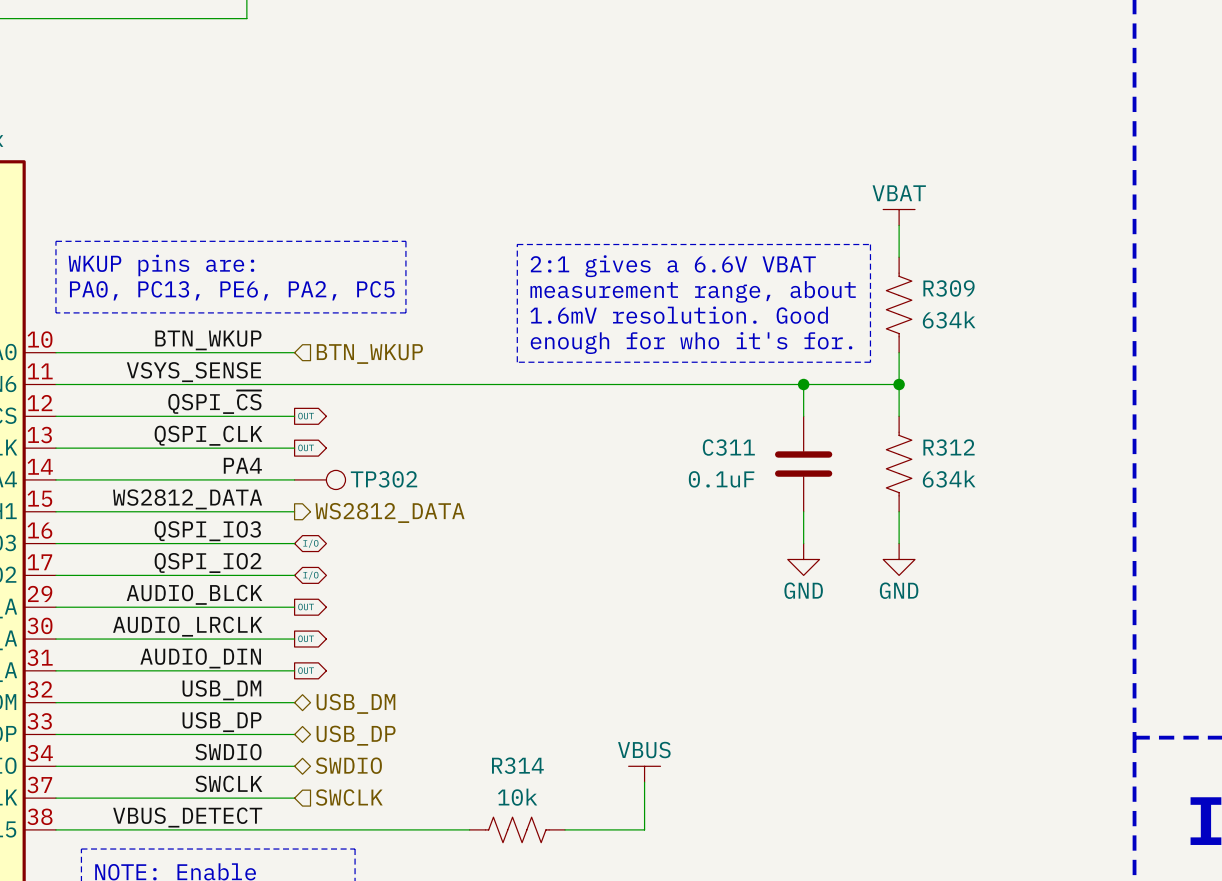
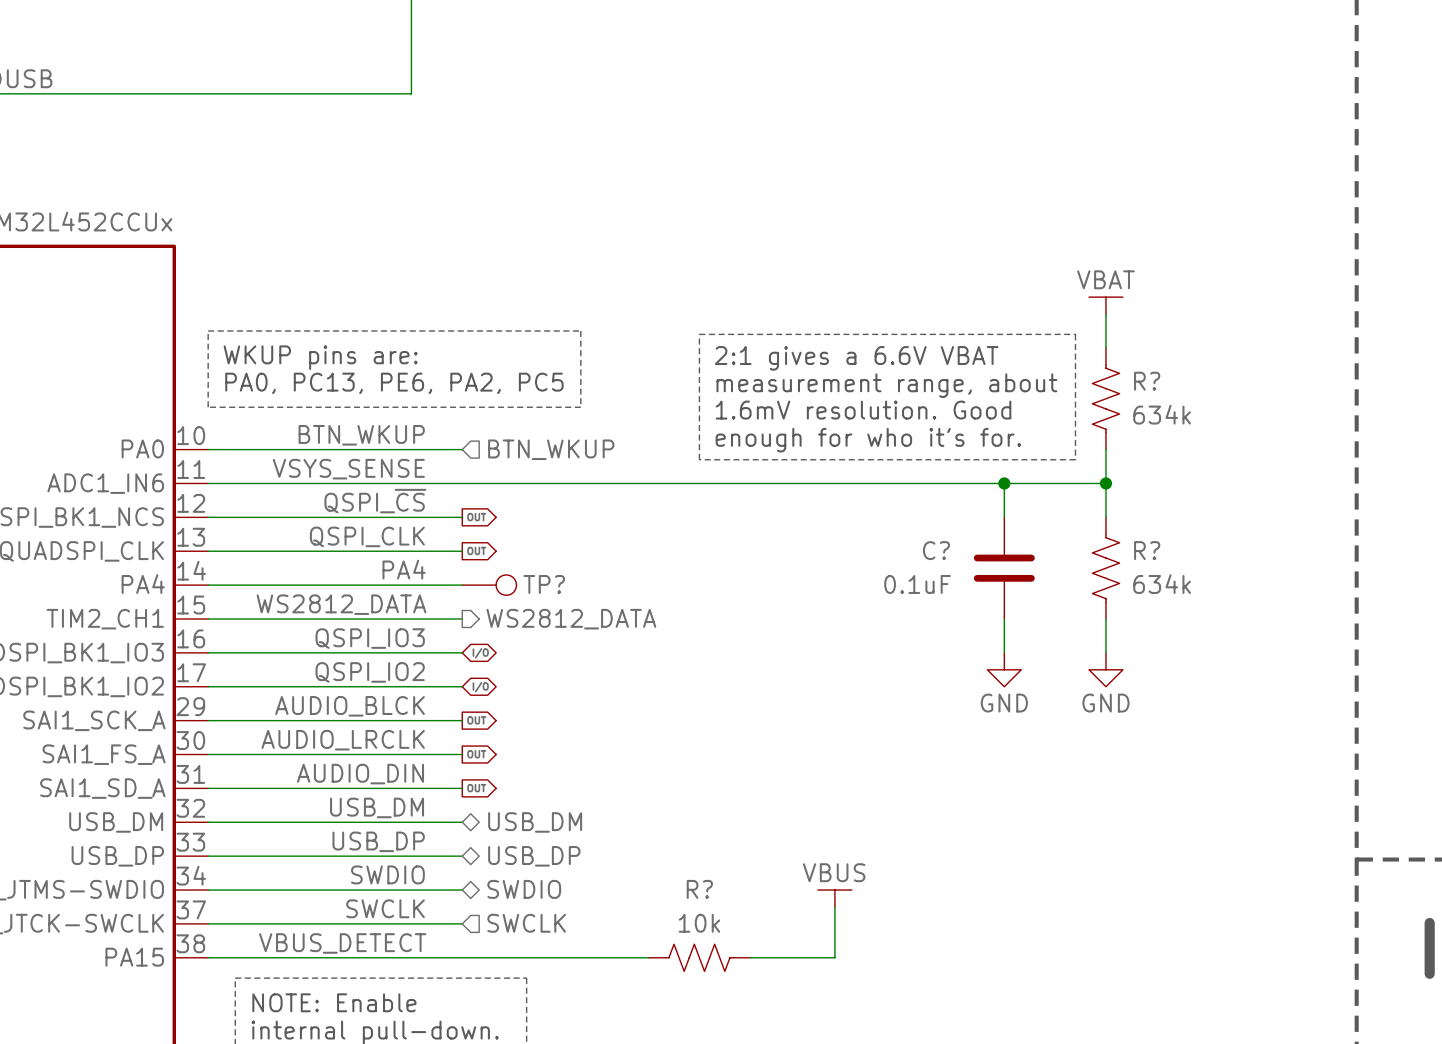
R309 name: R309 (949, 288) -> R? (1147, 381)
C311 name: C311 (728, 447) -> C? (936, 550)
R312 name: R312 (949, 447) -> R? (1147, 550)
TP302 name: TP302 (384, 479) -> TP? (544, 584)
R314 name: R314 (517, 765) -> R? (699, 889)

